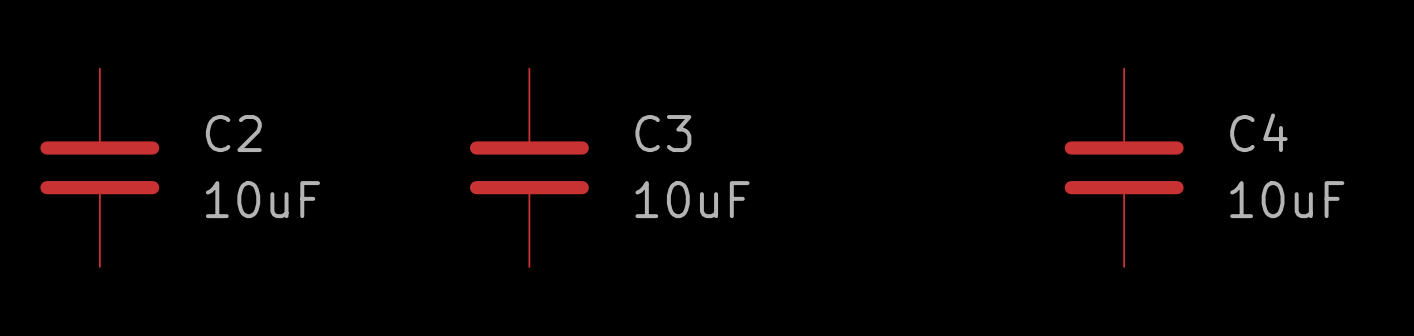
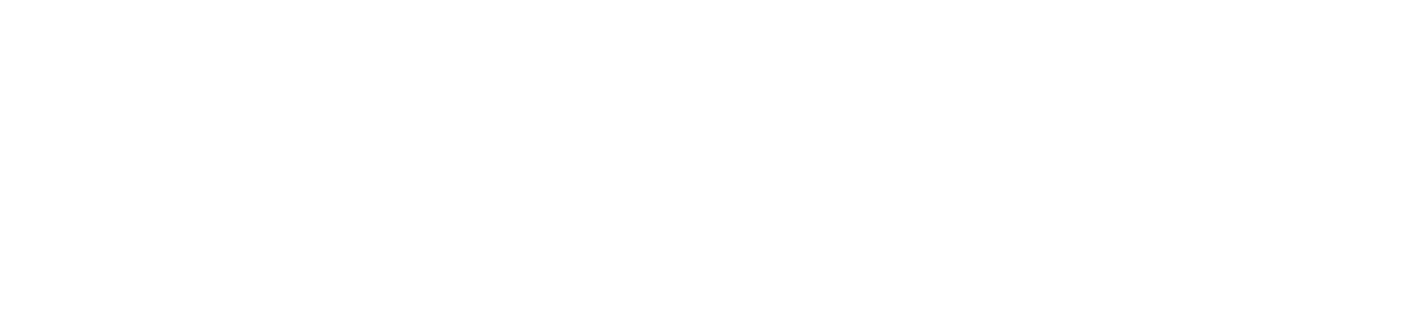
C2: 10uF (99, 167) -> none
C3: 10uF (529, 167) -> none
C4: 10uF (1124, 167) -> none

